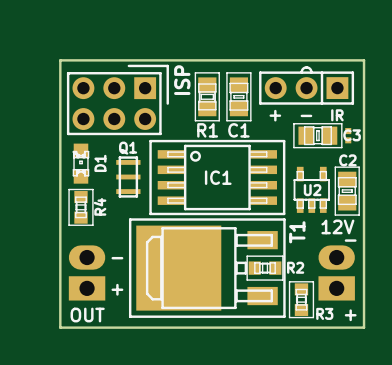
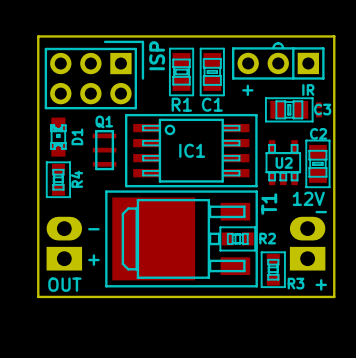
text: - (306, 115) -> none

